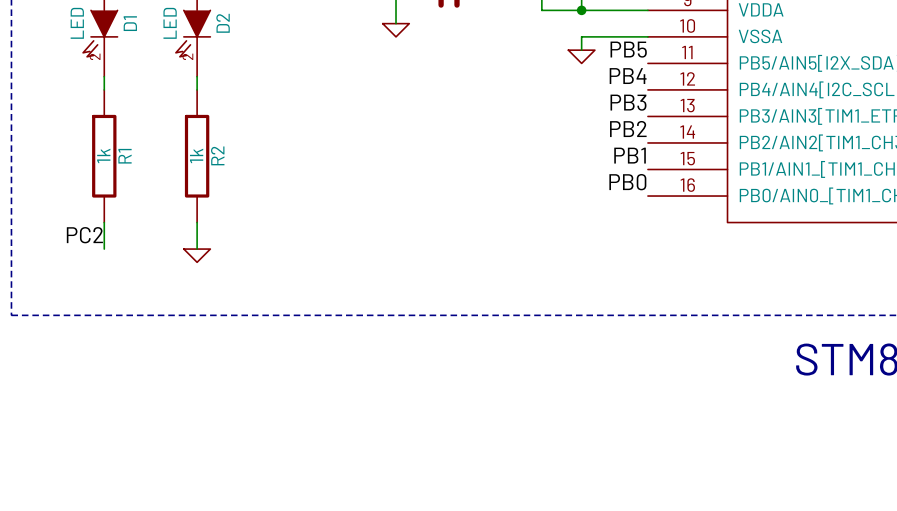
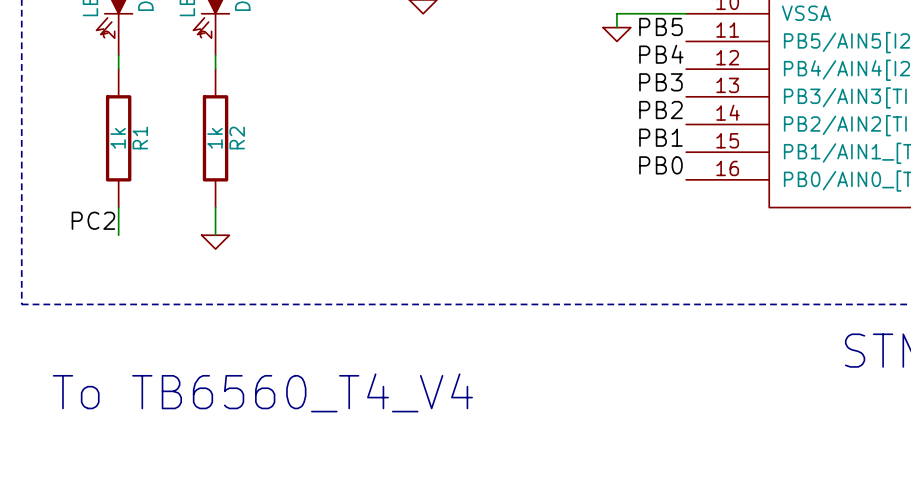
text: none -> To TB6560_T4_V4 (262, 392)

